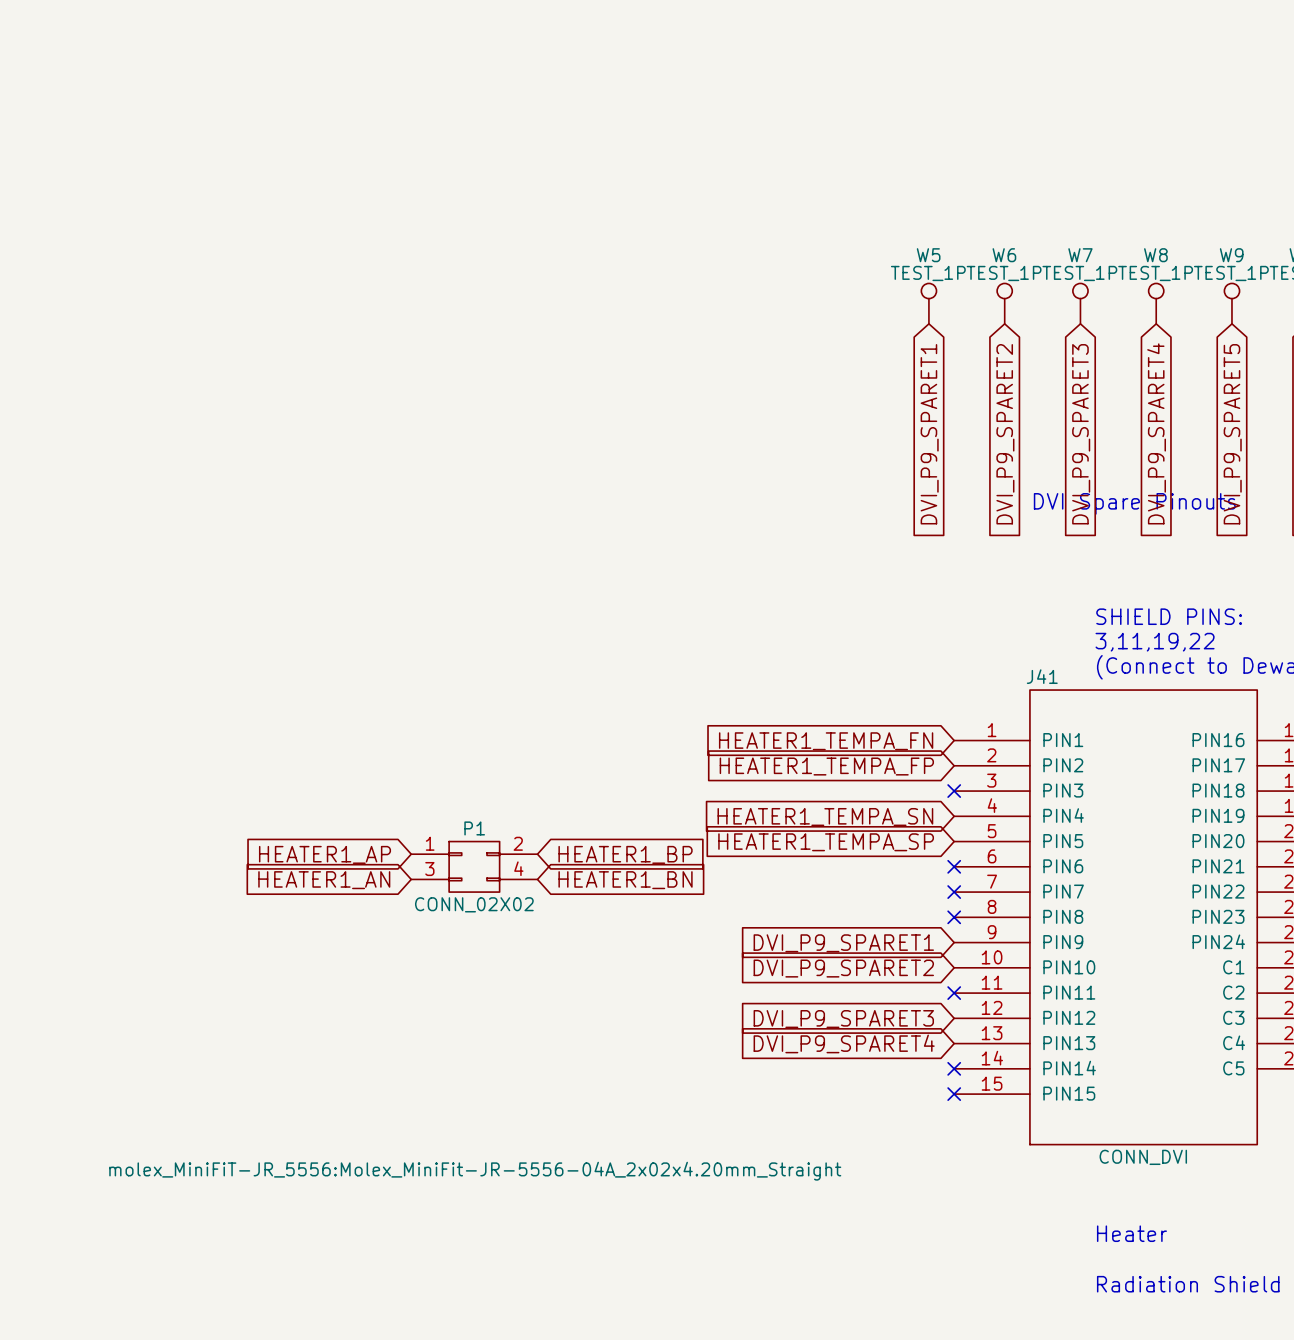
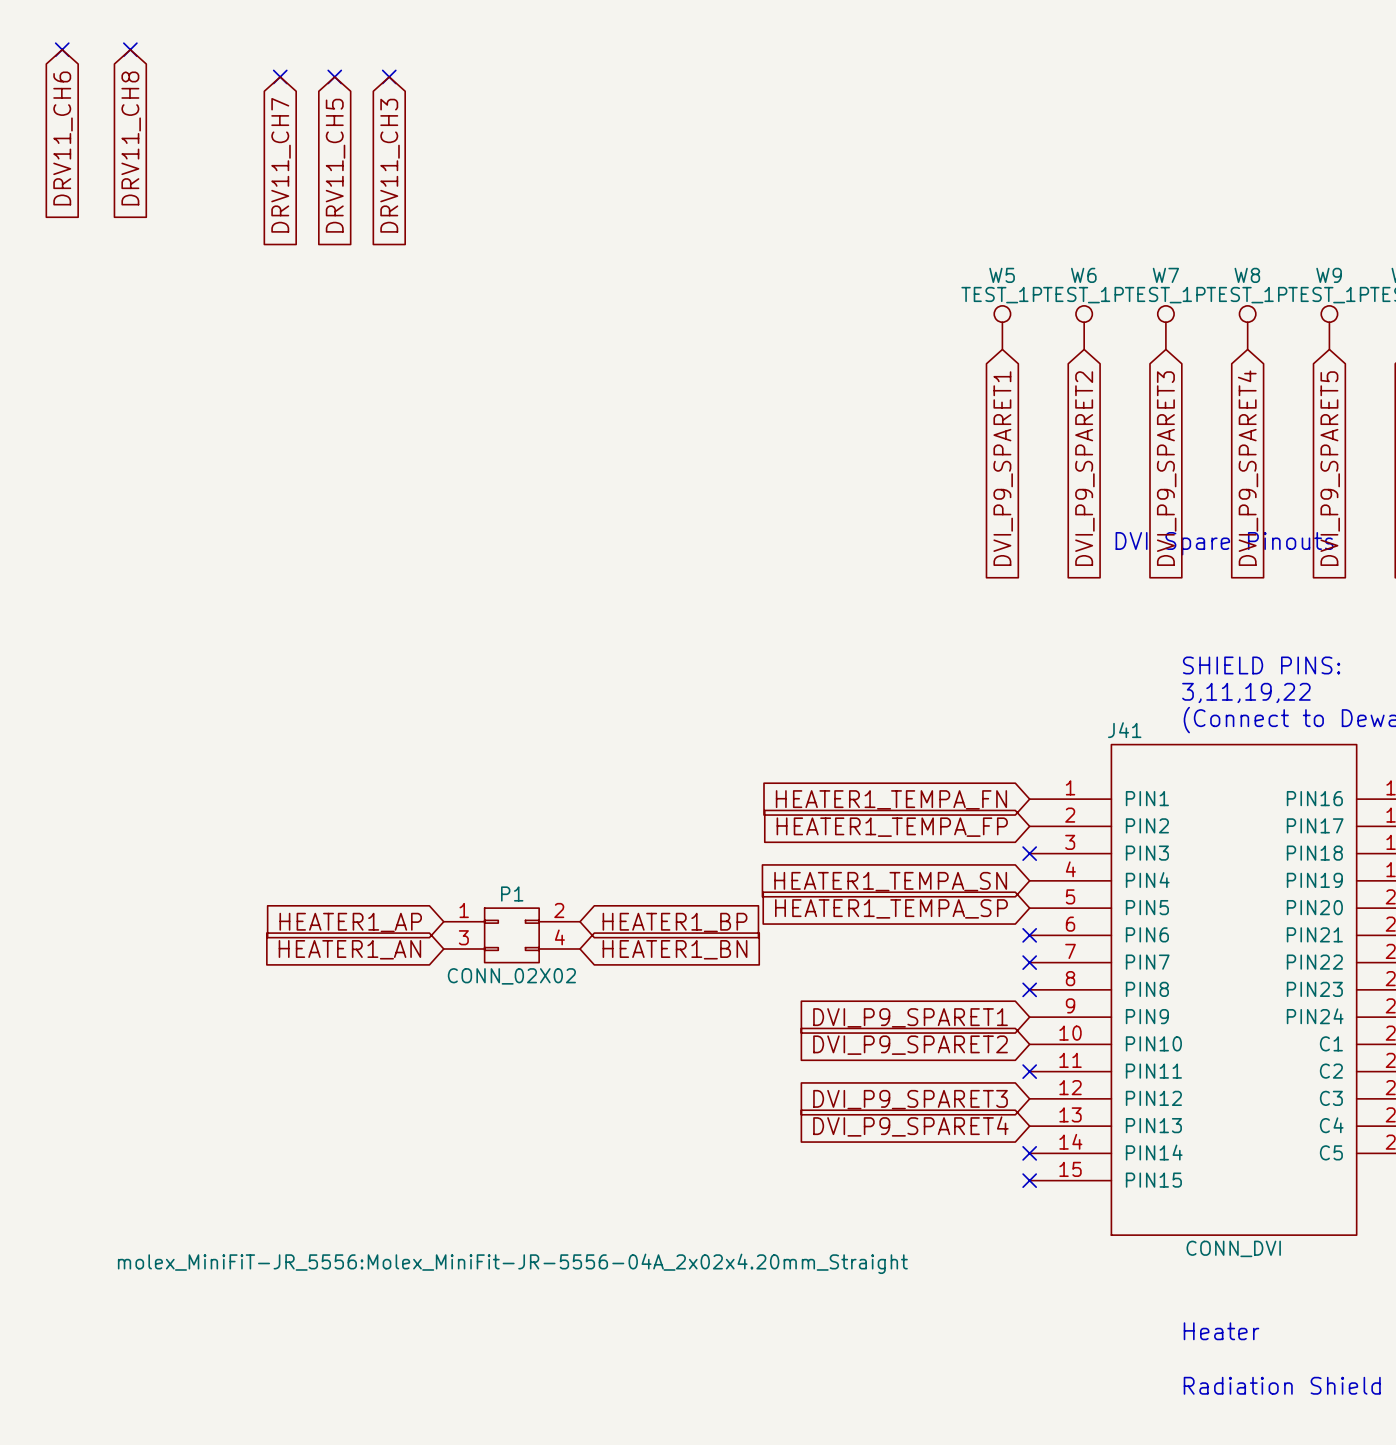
no-connect mark: none -> (62, 49)
no-connect mark: none -> (130, 49)
no-connect mark: none -> (280, 76)
no-connect mark: none -> (334, 76)
no-connect mark: none -> (389, 76)
global label: none -> DRV11_CH6 (63, 138)
global label: none -> DRV11_CH8 (131, 138)
global label: none -> DRV11_CH7 (281, 165)
global label: none -> DRV11_CH5 (335, 165)
global label: none -> DRV11_CH3 (390, 165)

